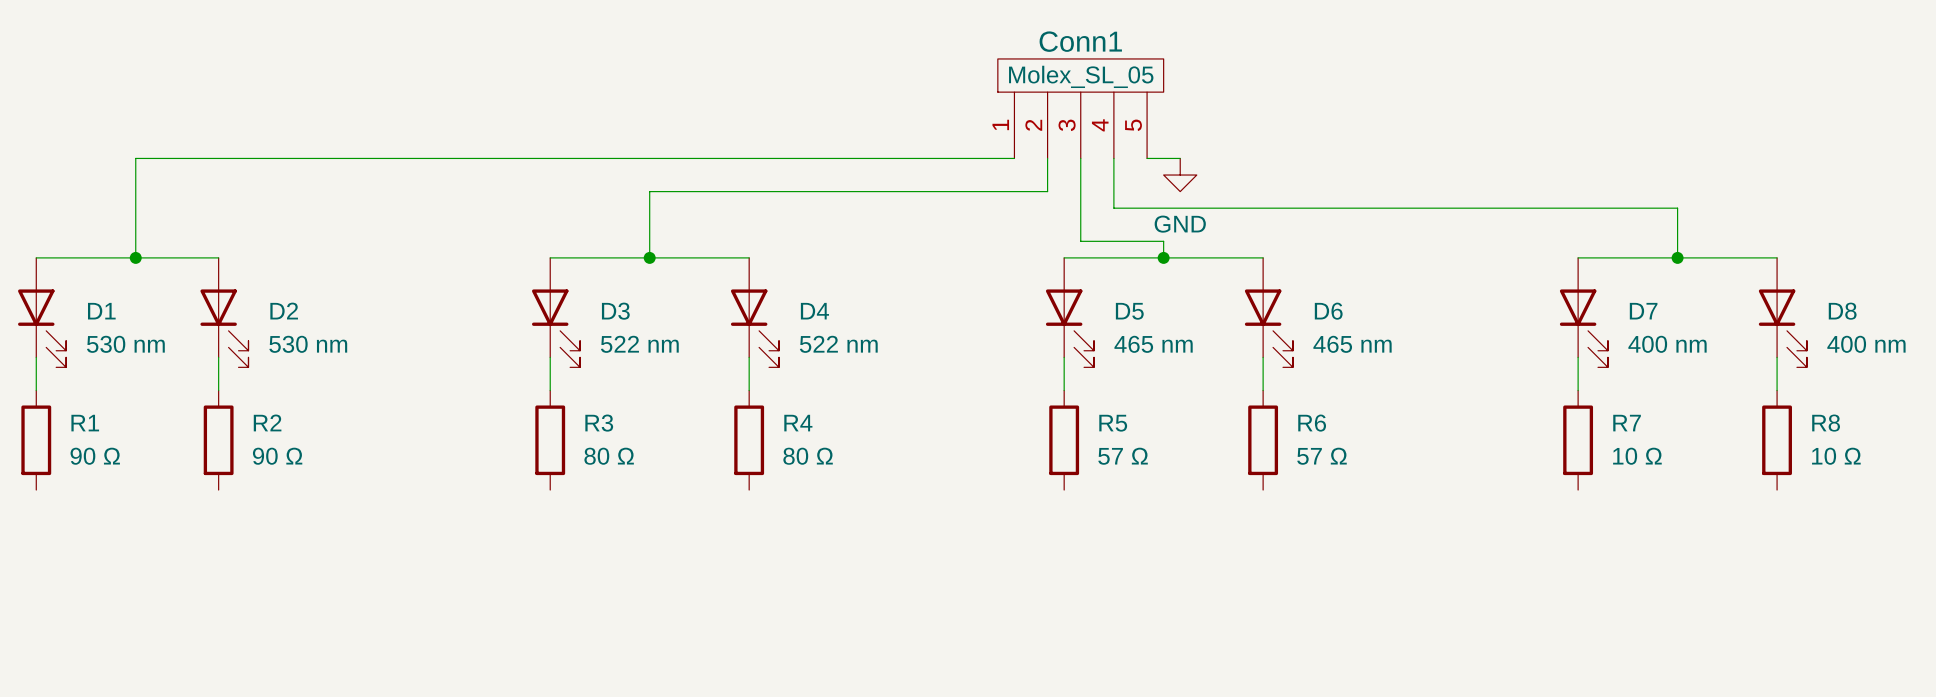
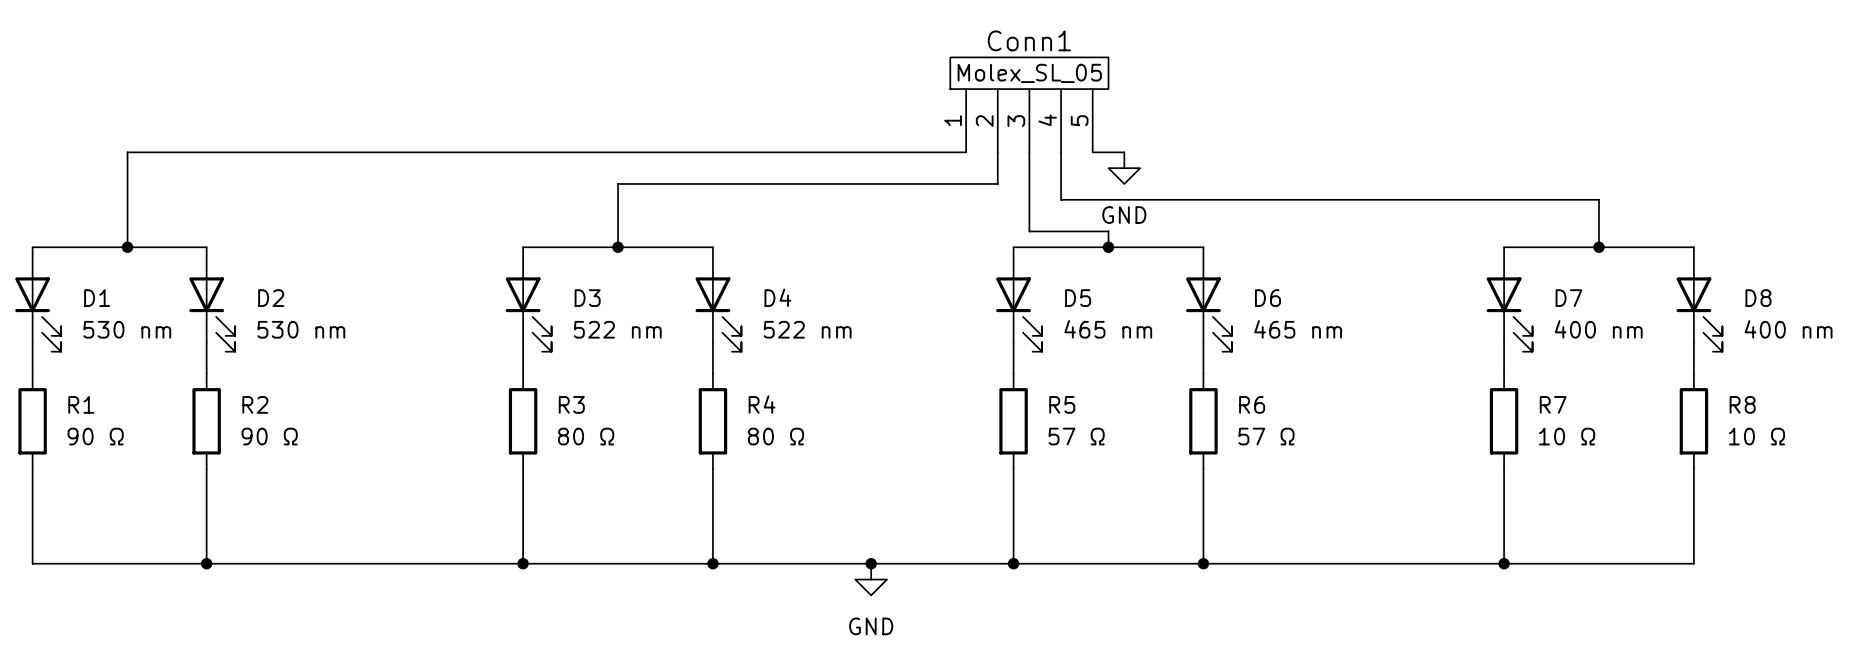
wire: none -> (32, 468) (32, 563) (1693, 563) (1693, 468)
wire: none -> (206, 468) (206, 563)
wire: none -> (523, 468) (523, 563)
wire: none -> (712, 468) (712, 563)
wire: none -> (1013, 468) (1013, 563)
wire: none -> (1203, 468) (1203, 563)
wire: none -> (1504, 468) (1504, 563)
junction: none -> (206, 563)
junction: none -> (523, 563)
junction: none -> (712, 563)
junction: none -> (871, 563)
junction: none -> (1013, 563)
junction: none -> (1203, 563)
junction: none -> (1504, 563)
power symbol: none -> GND (871, 579)

